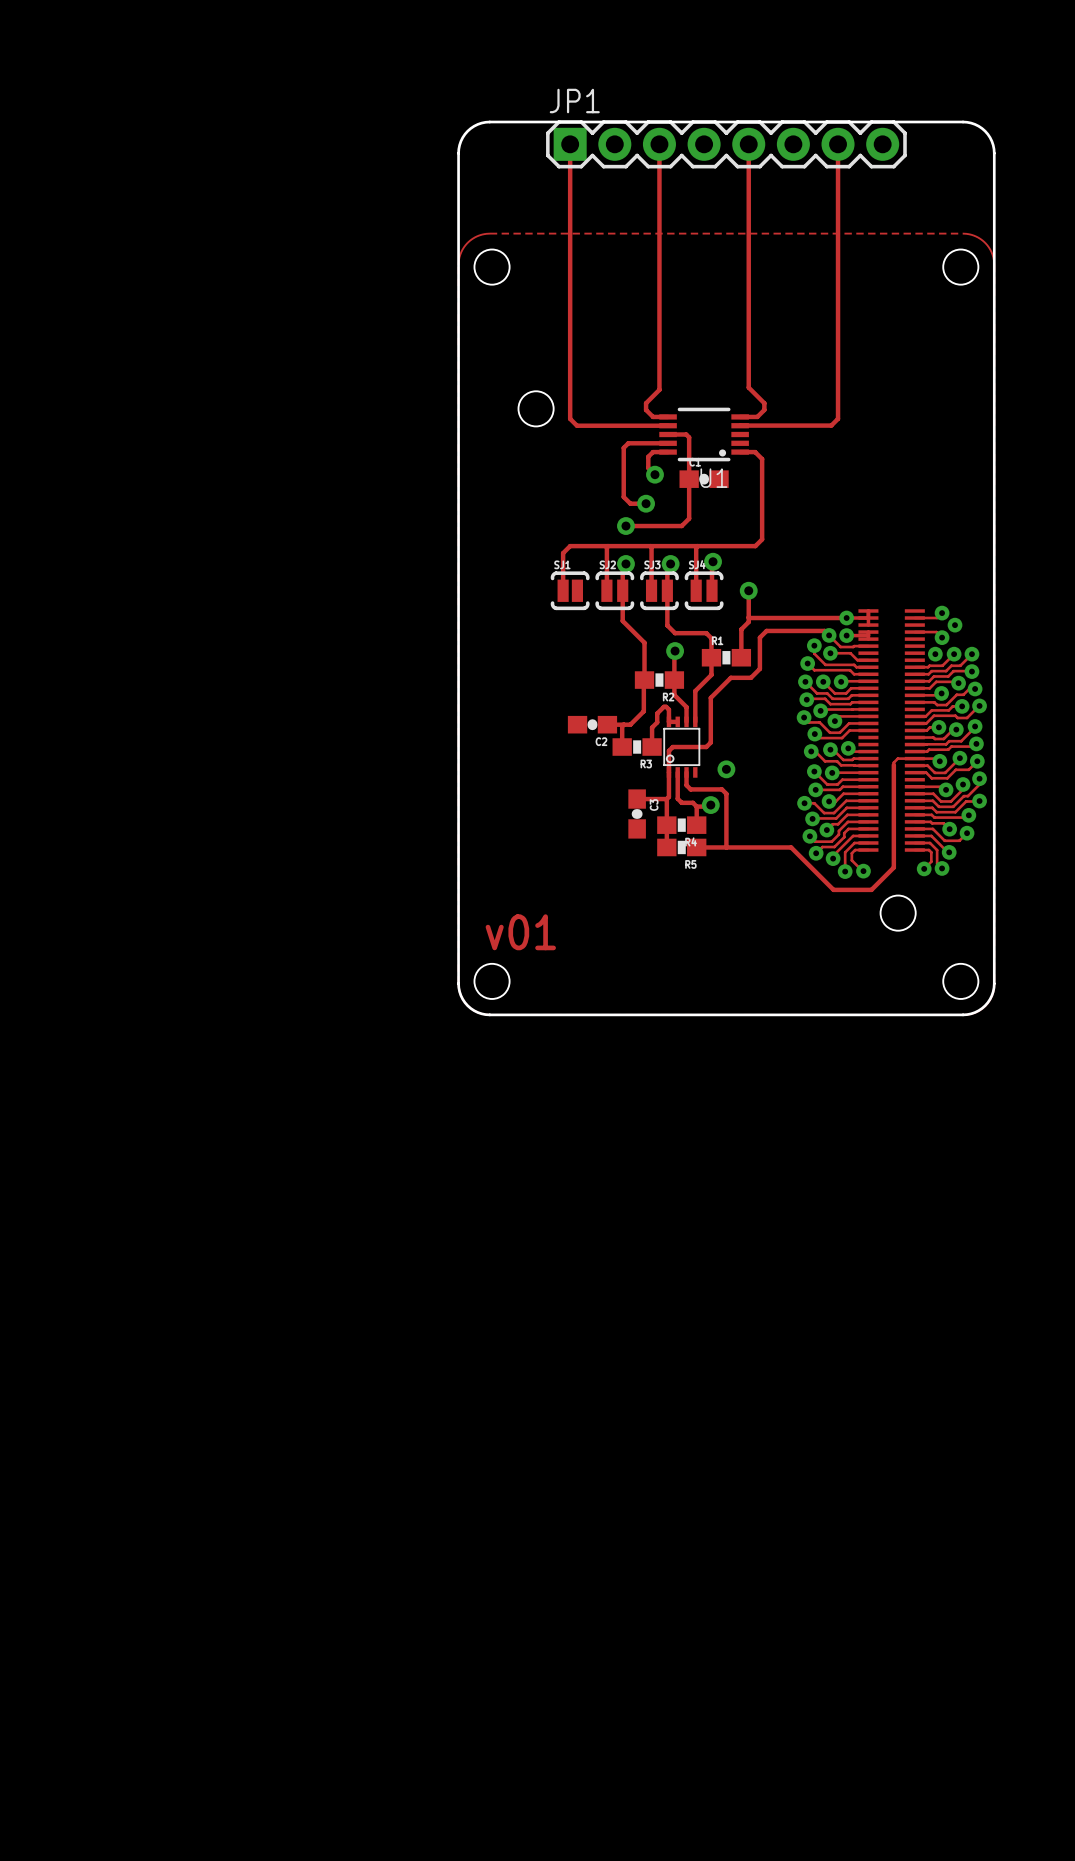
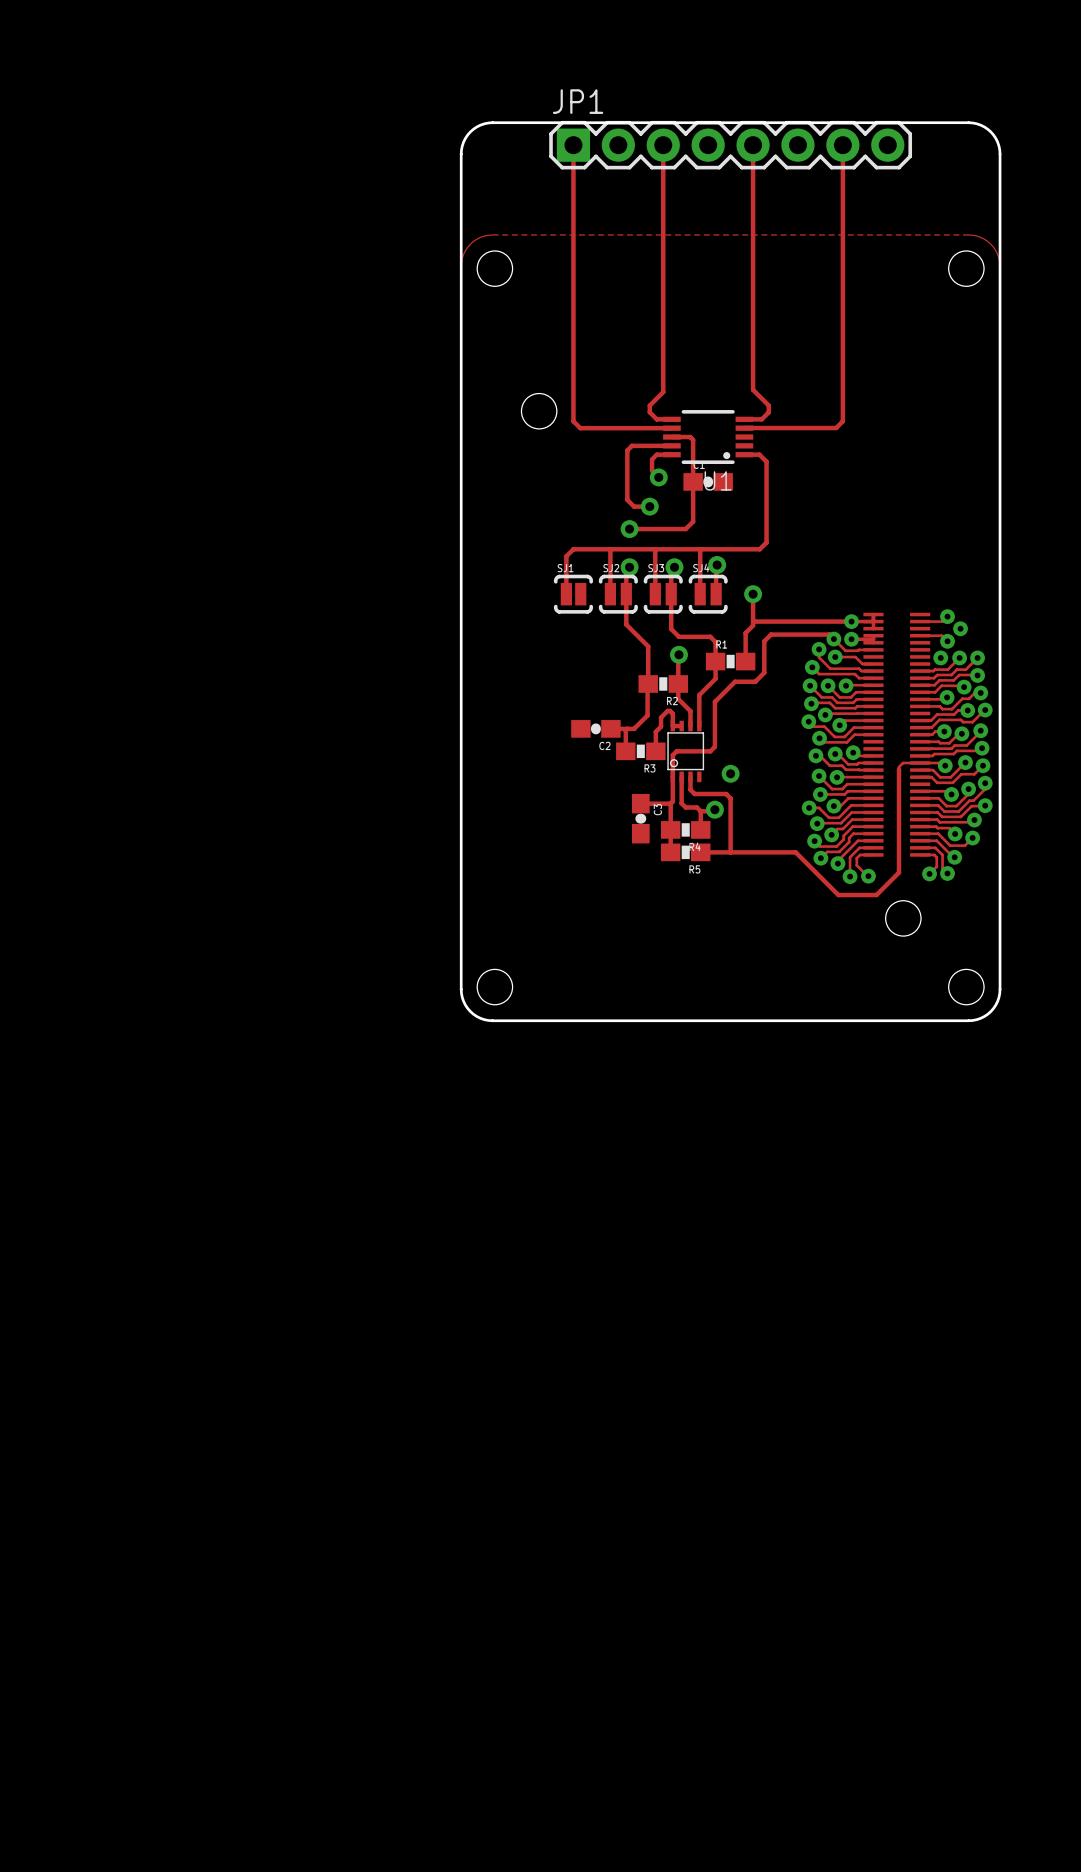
text: v01 (520, 932) -> none

